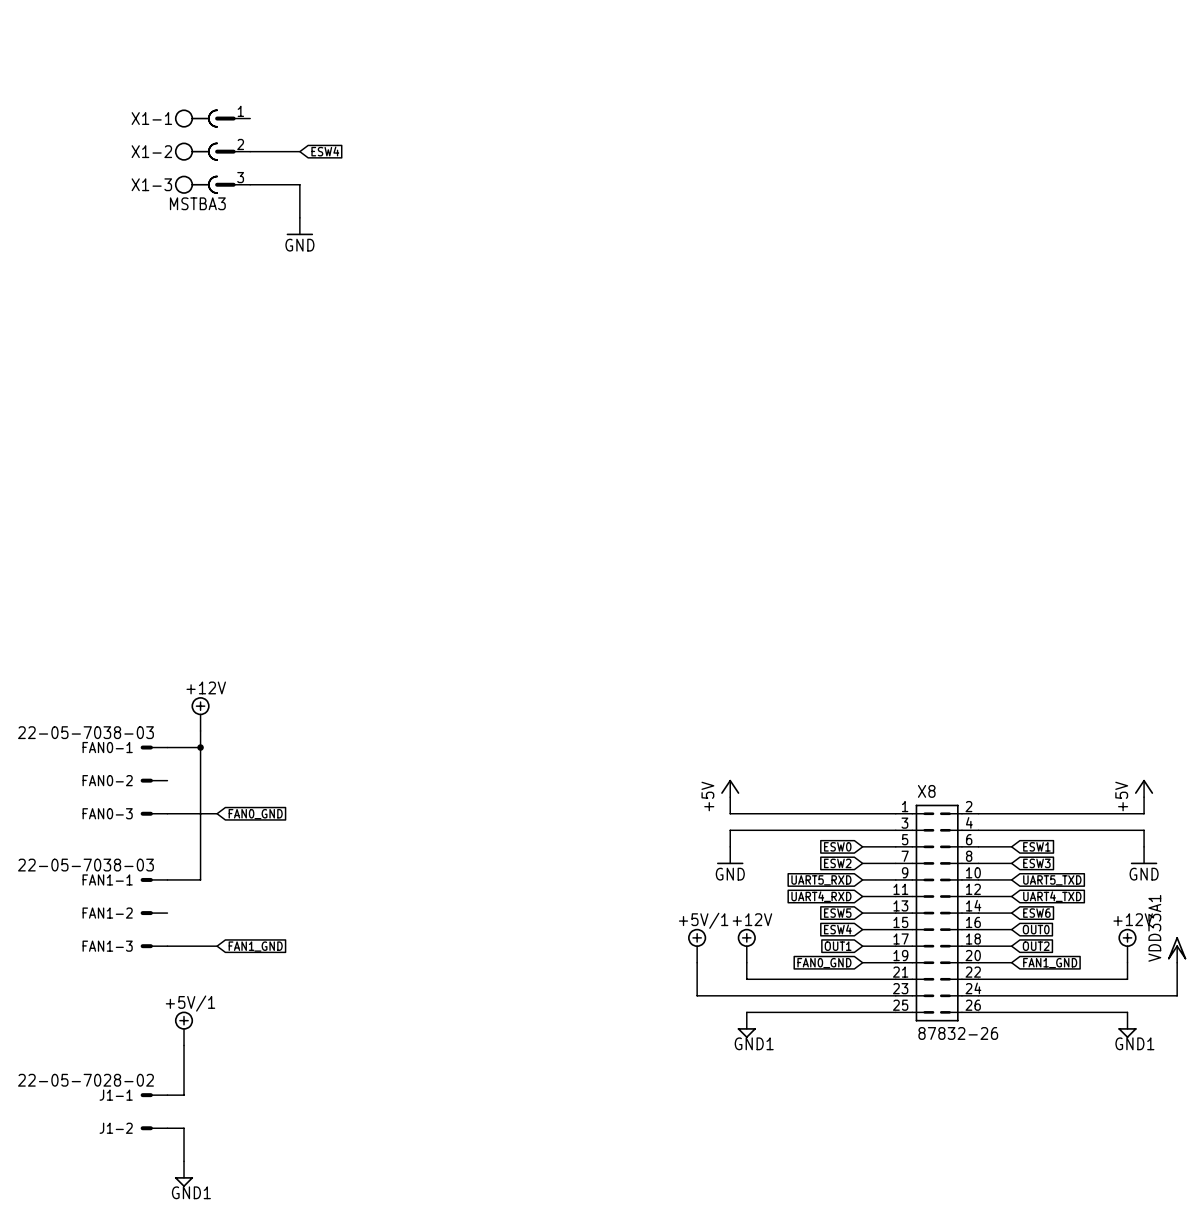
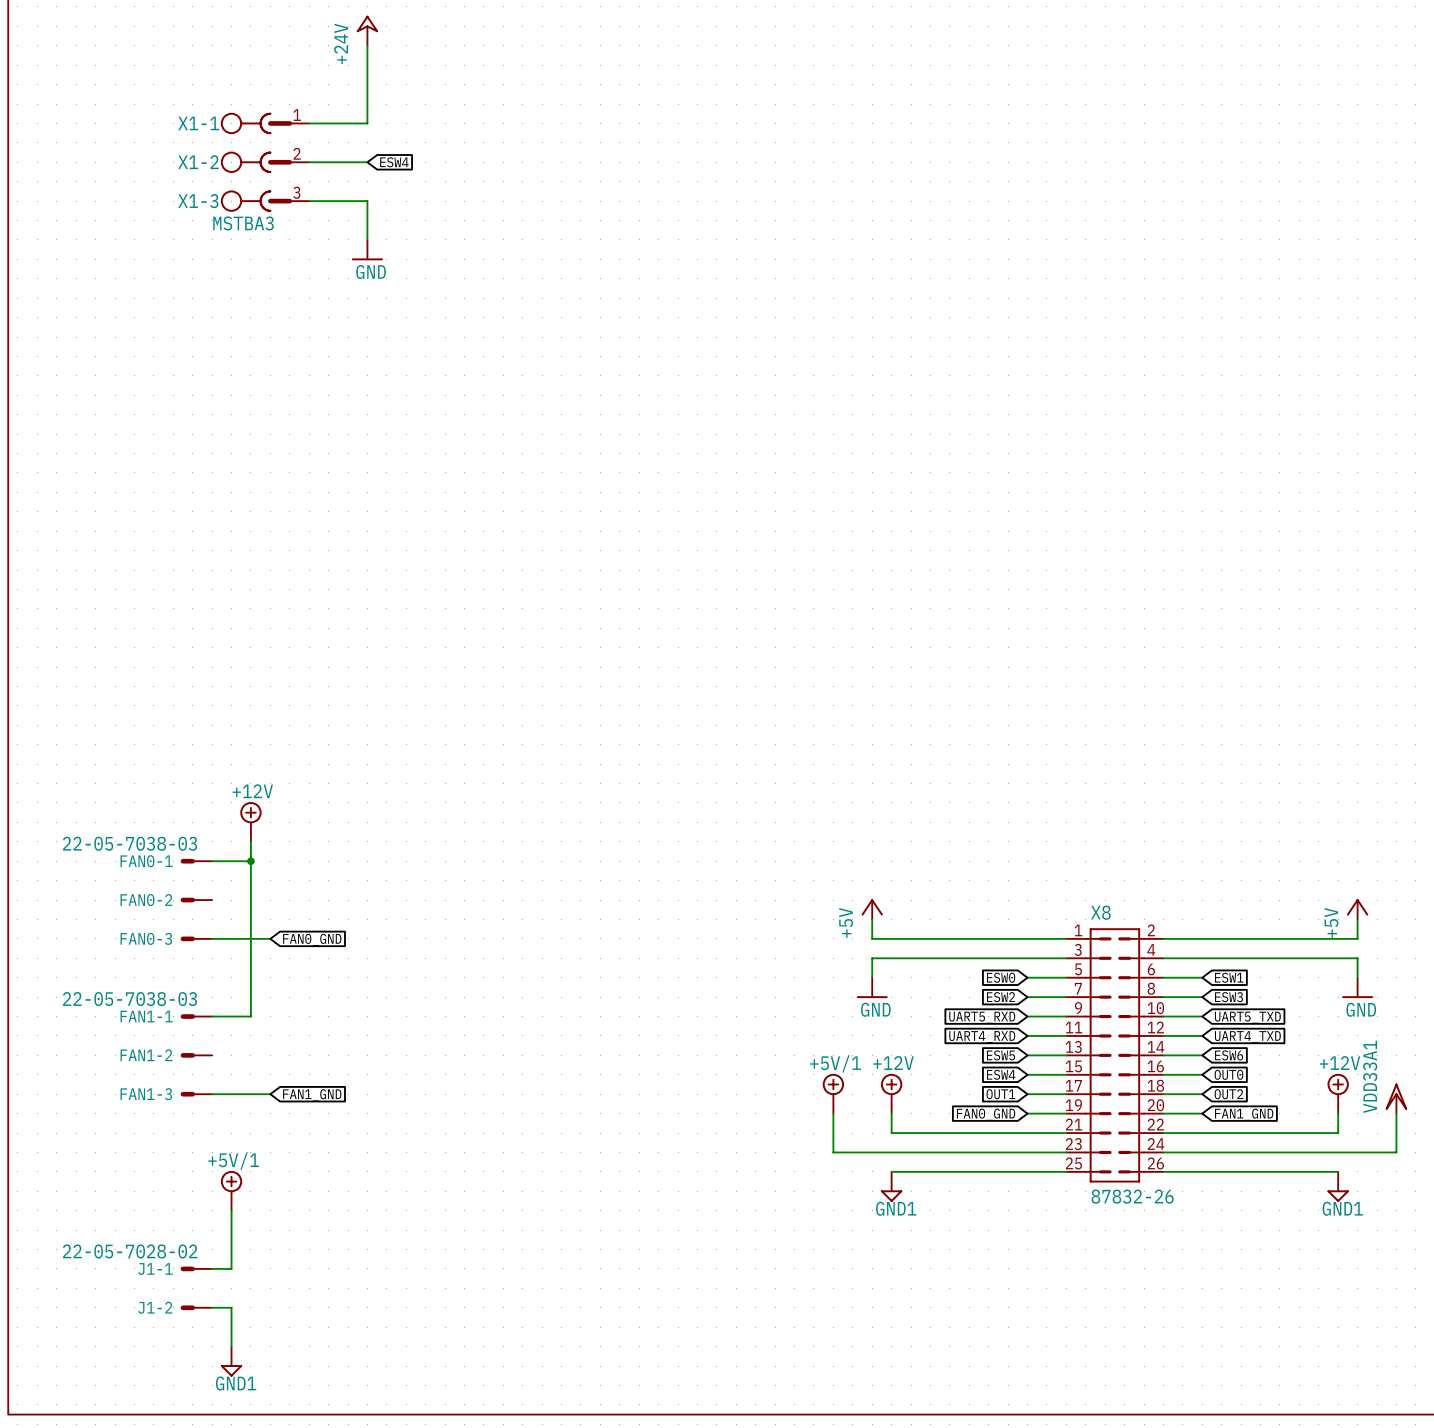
power symbol: none -> +24V (367, 30)
wire: none -> (367, 45) (367, 123) (309, 123)

